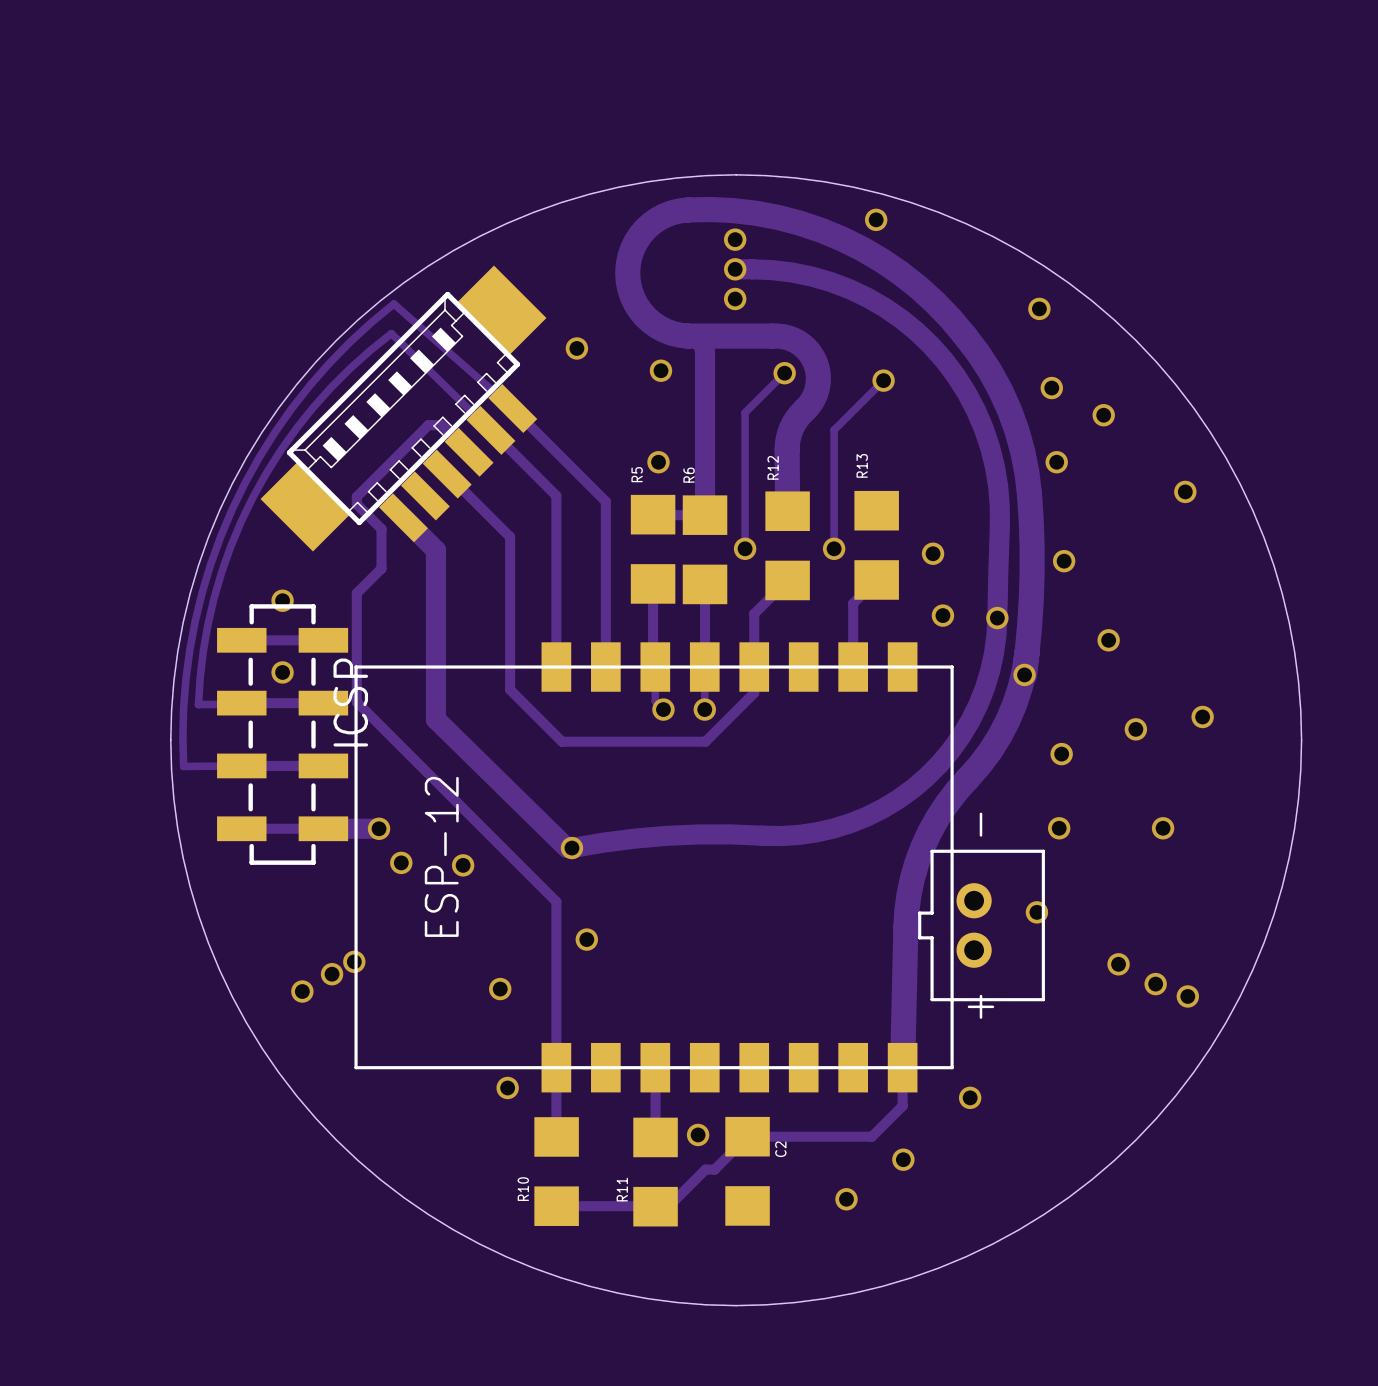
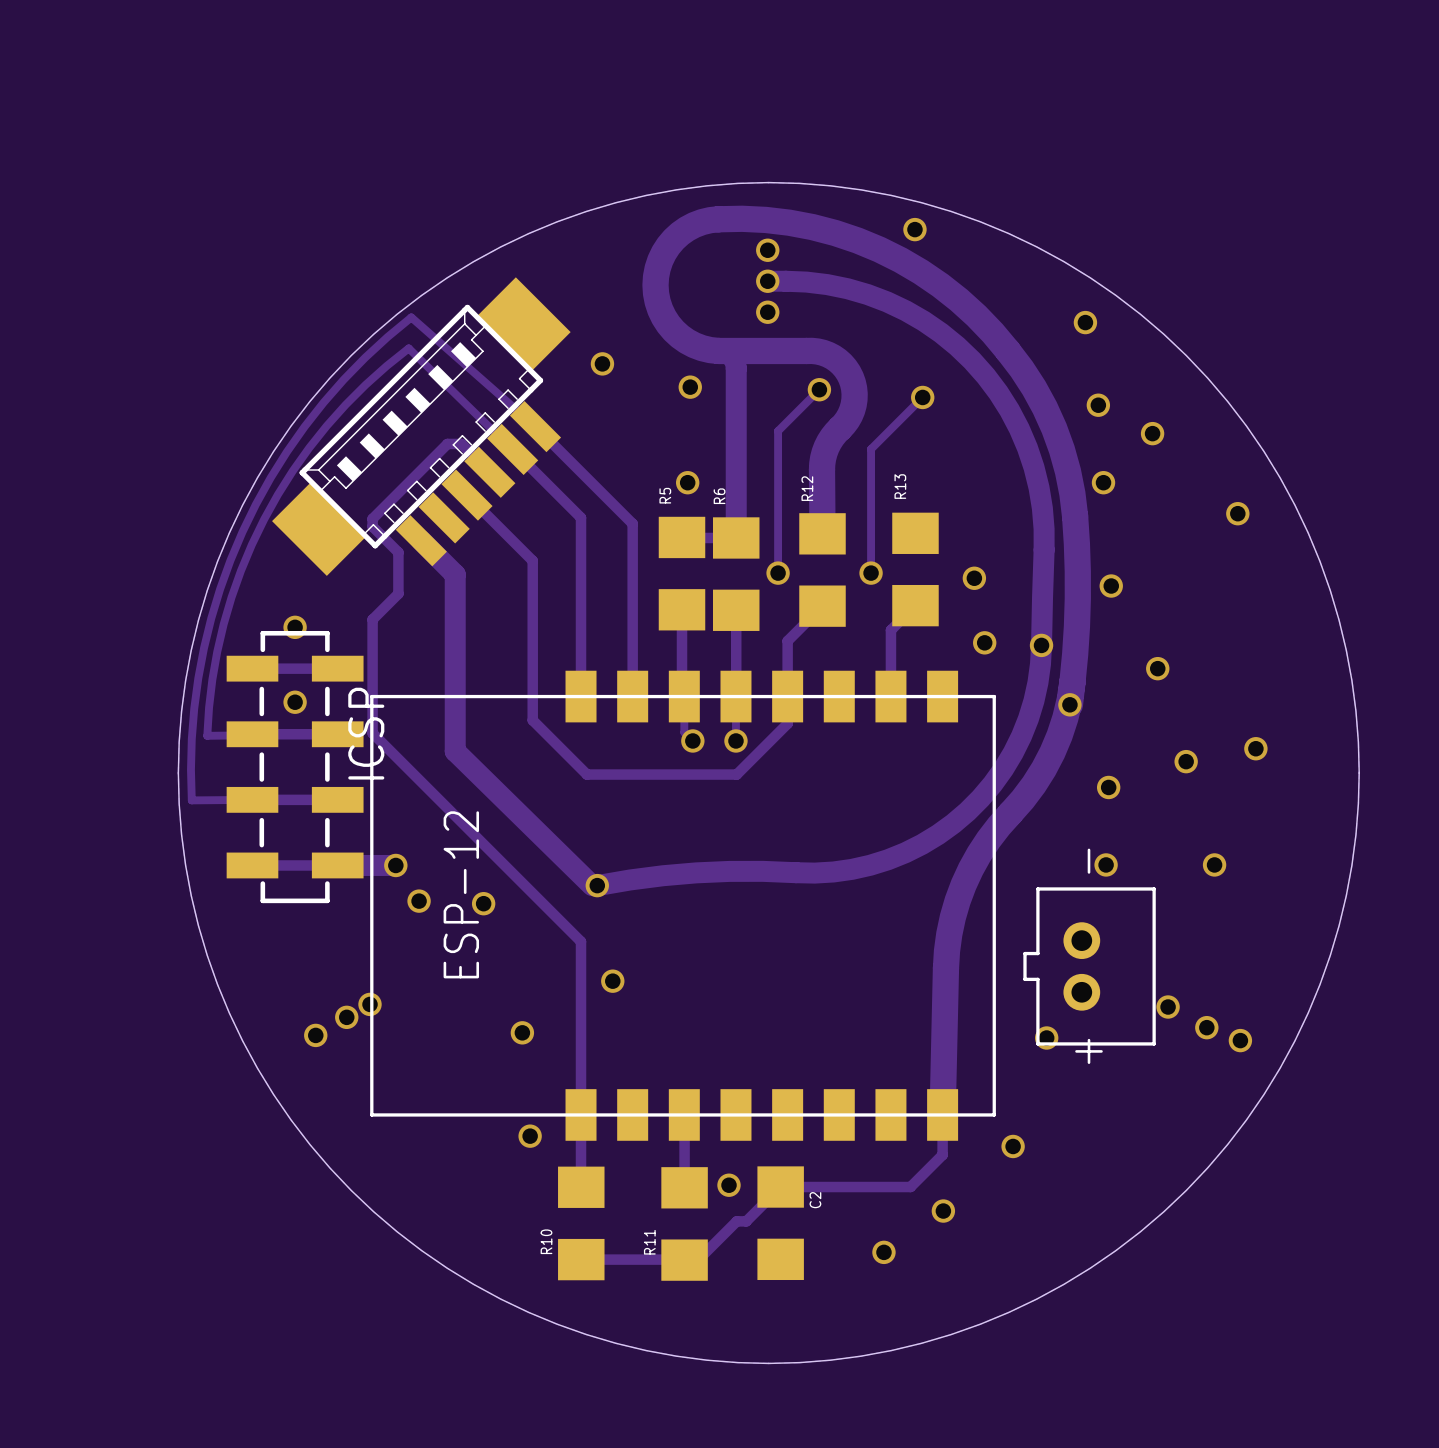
via position: (1036, 912) -> (1046, 1038)
part position: (981, 925) -> (1089, 966)

